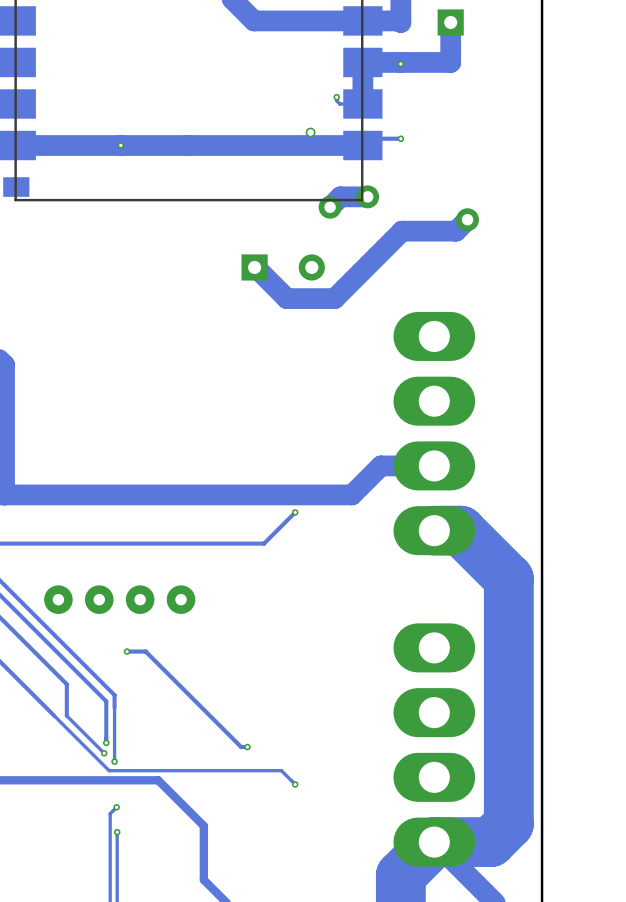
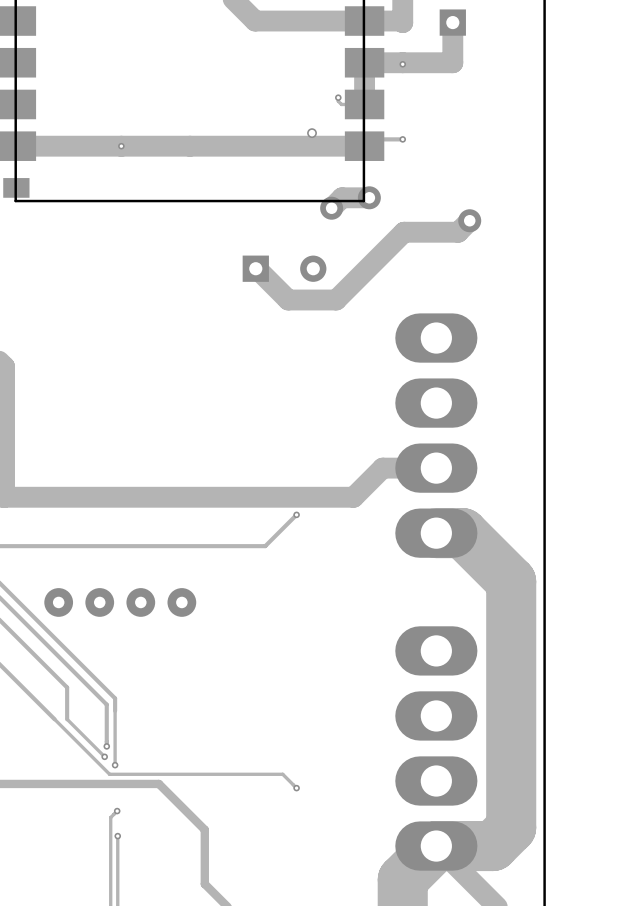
track: (127, 651) (145, 651) (241, 747) (247, 747) -> none
via: (127, 651) -> none
via: (247, 747) -> none

